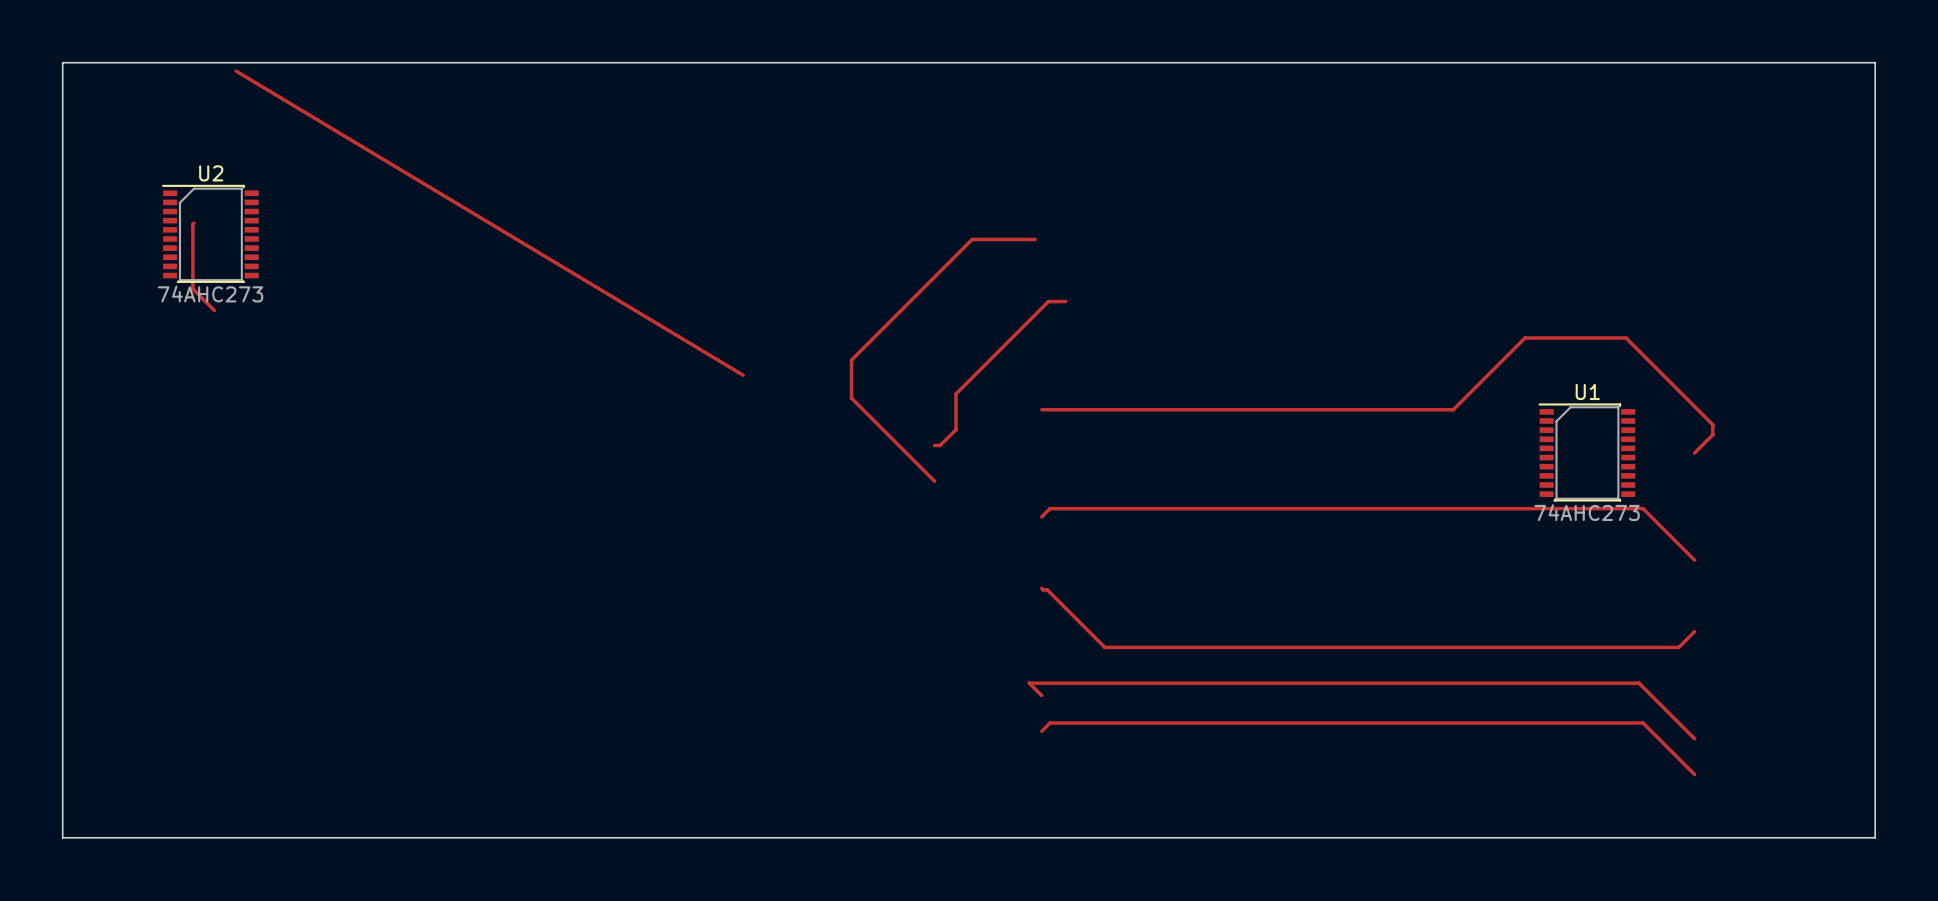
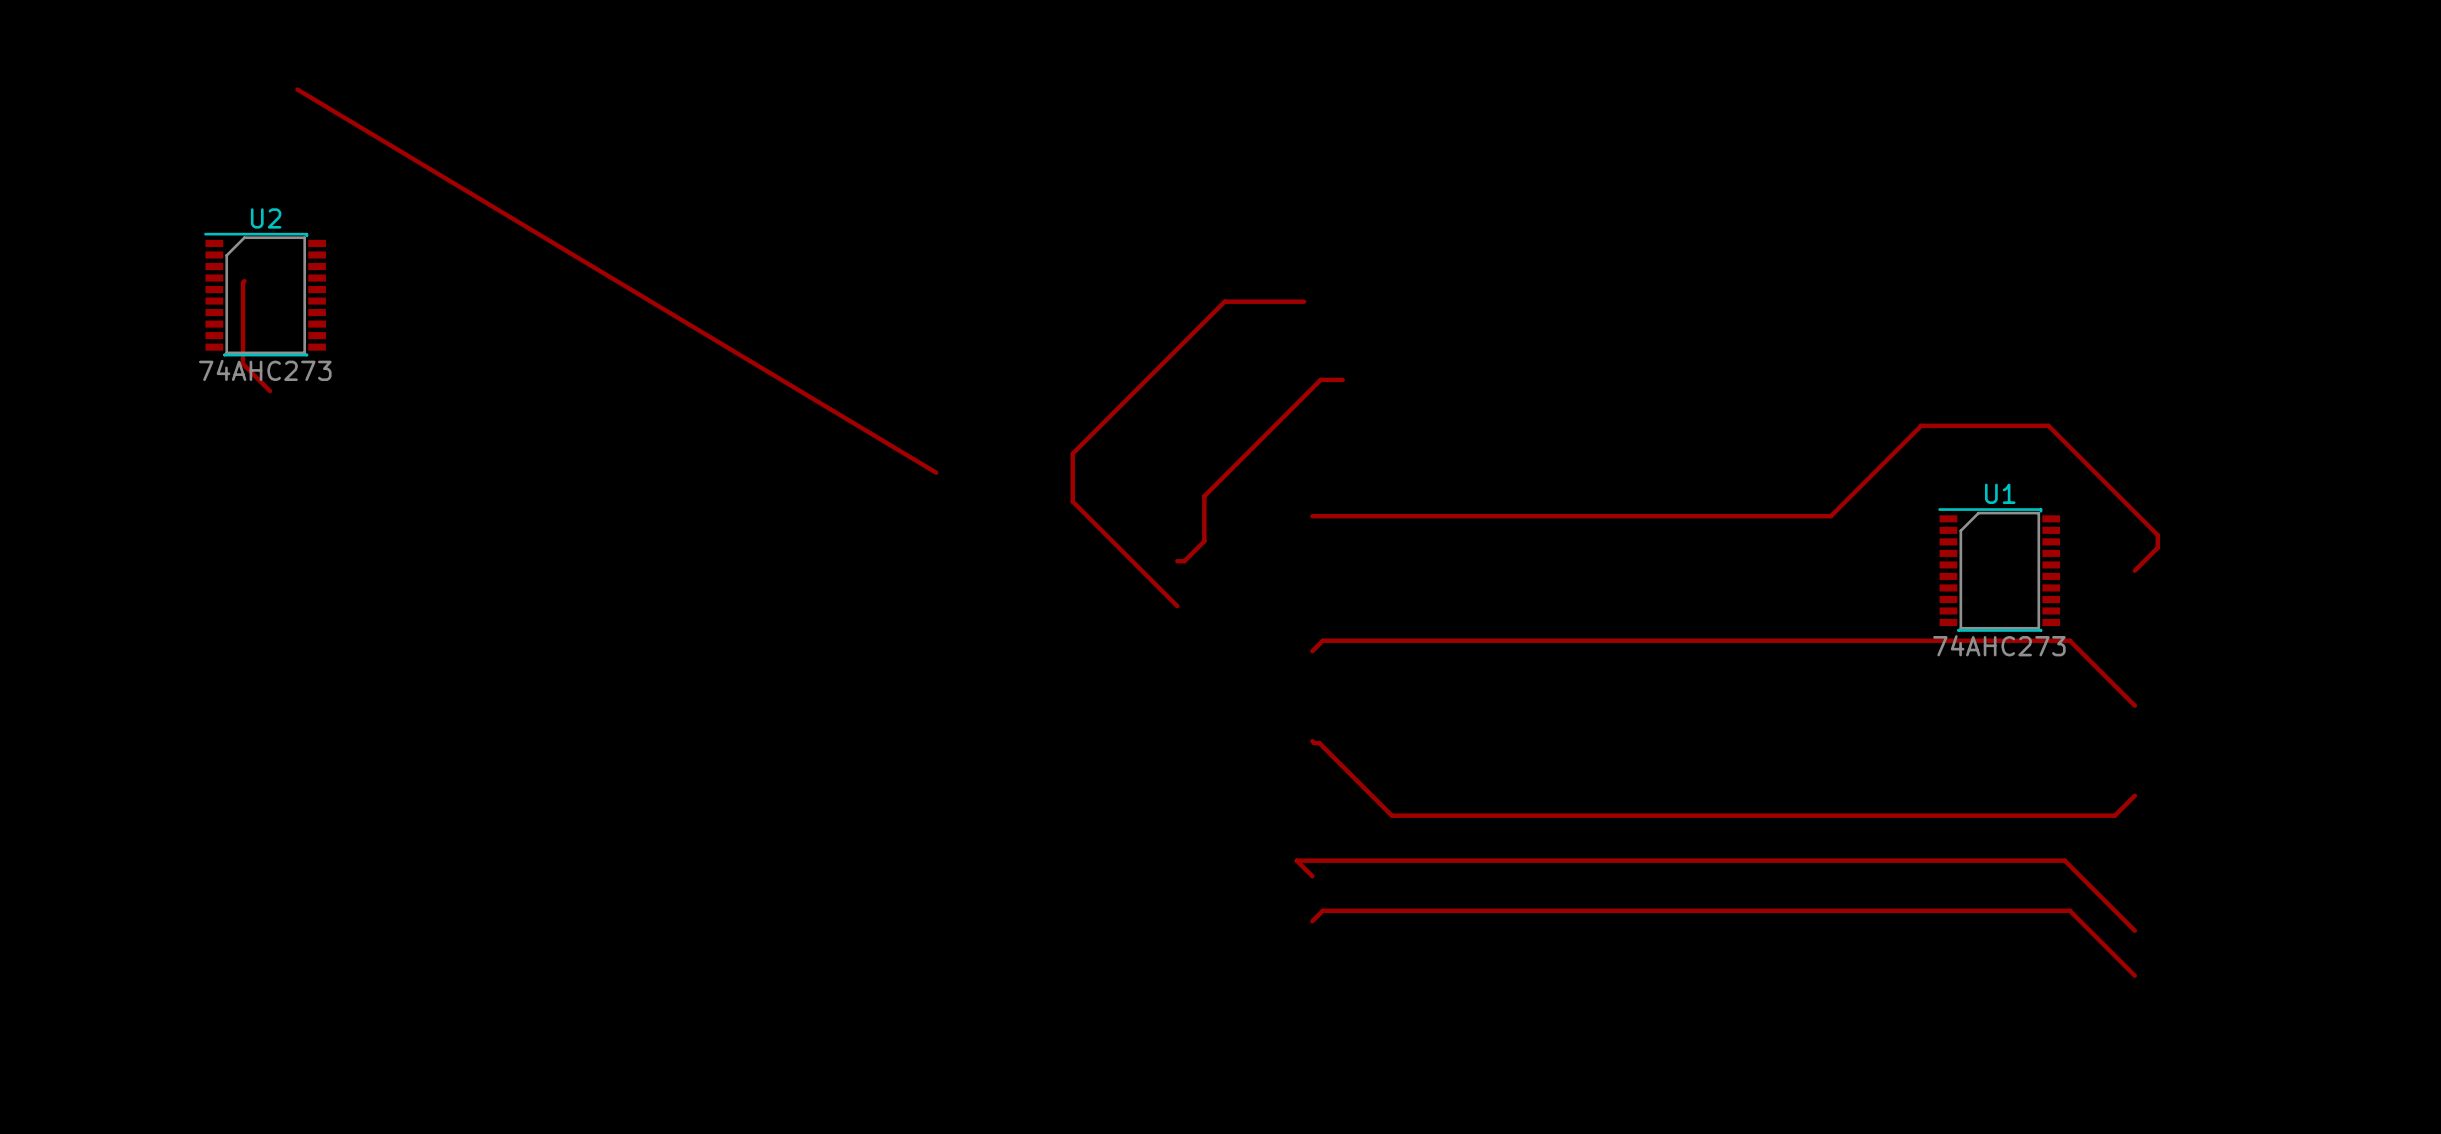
board edge: (62, 62) (1875, 62) (1875, 837) (62, 837) (62, 62) -> none

